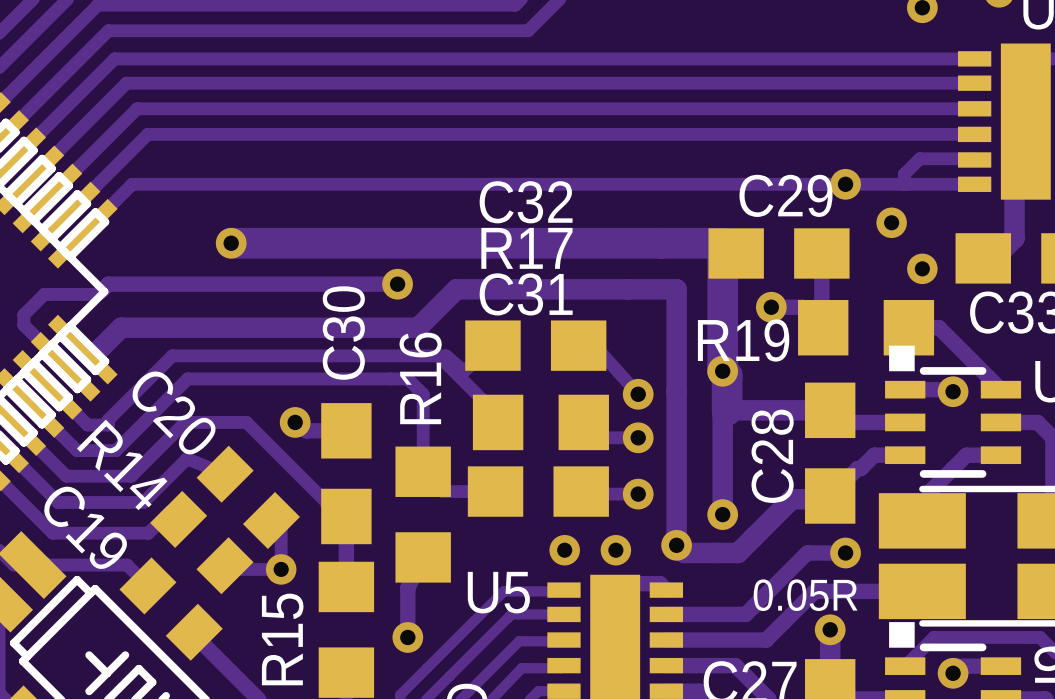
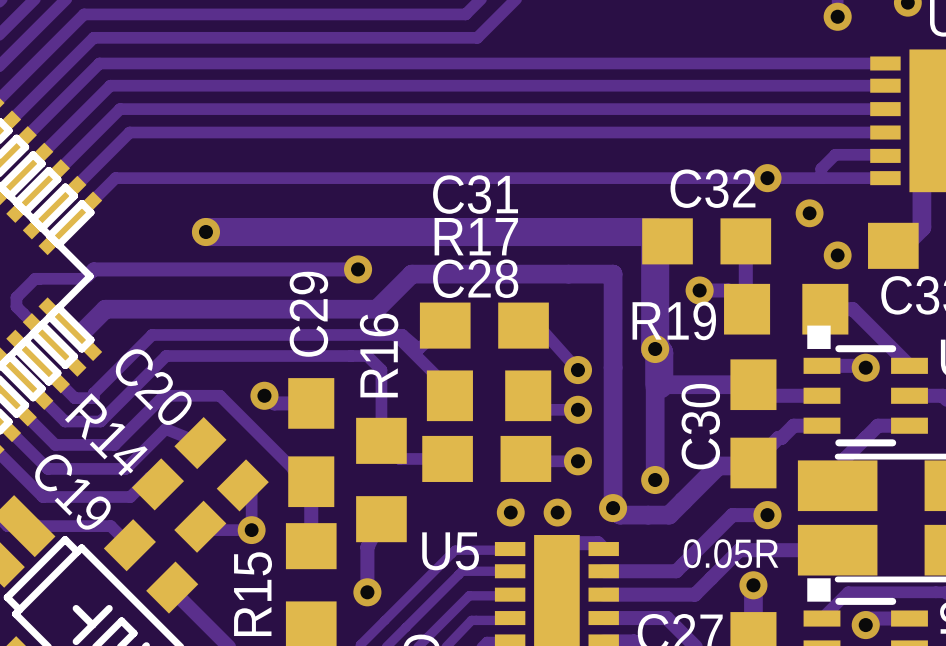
C29 name: C29 (786, 195) -> C32 (712, 188)
C32 name: C32 (526, 202) -> C31 (475, 194)
C31 name: C31 (526, 294) -> C28 (475, 278)
C30 name: C30 (343, 333) -> C29 (308, 314)
C28 name: C28 (772, 456) -> C30 (700, 426)

